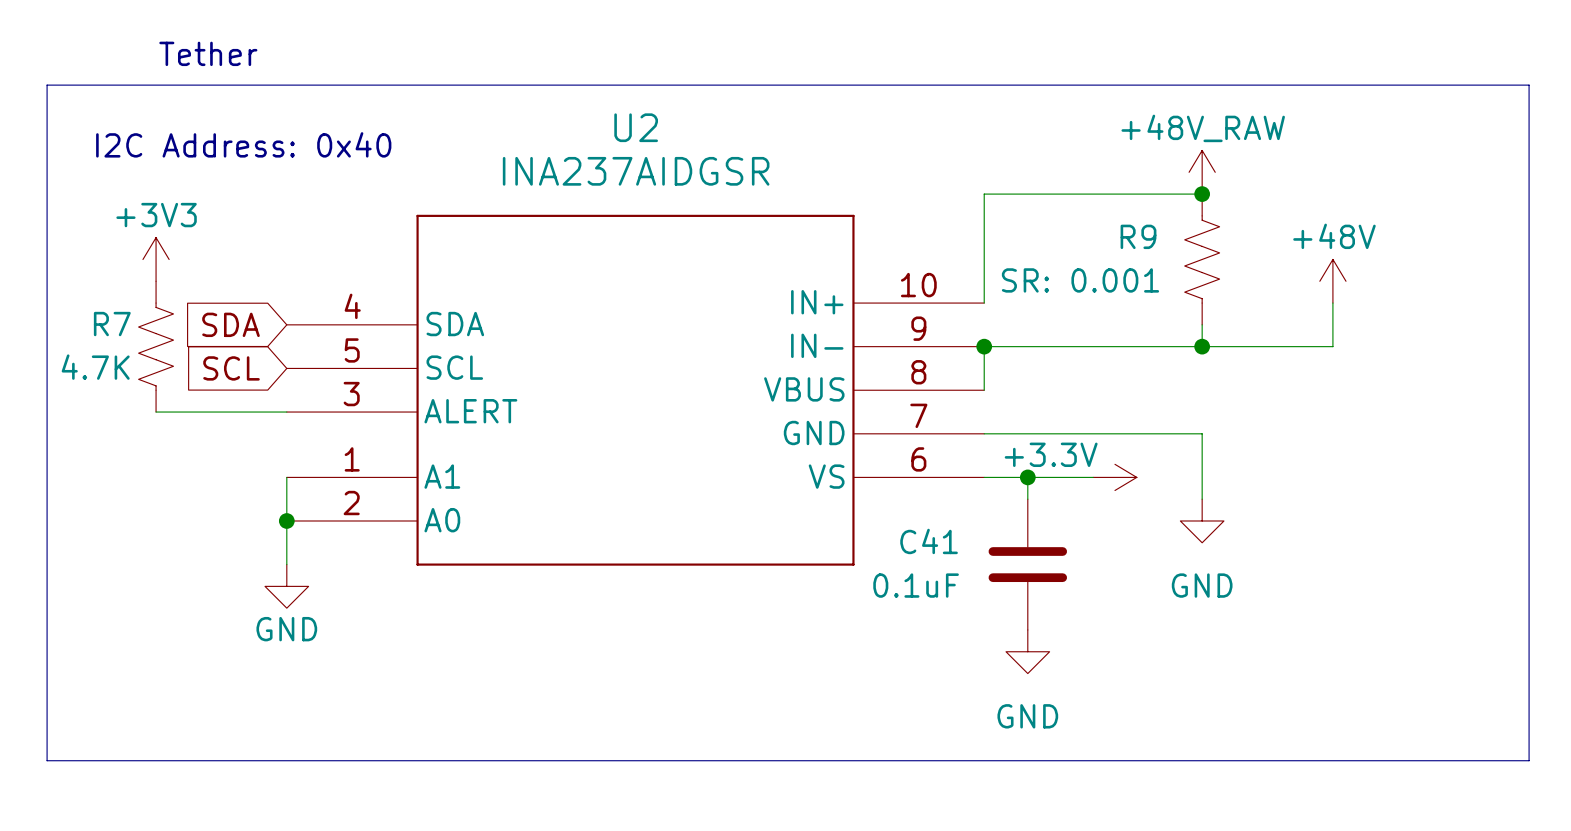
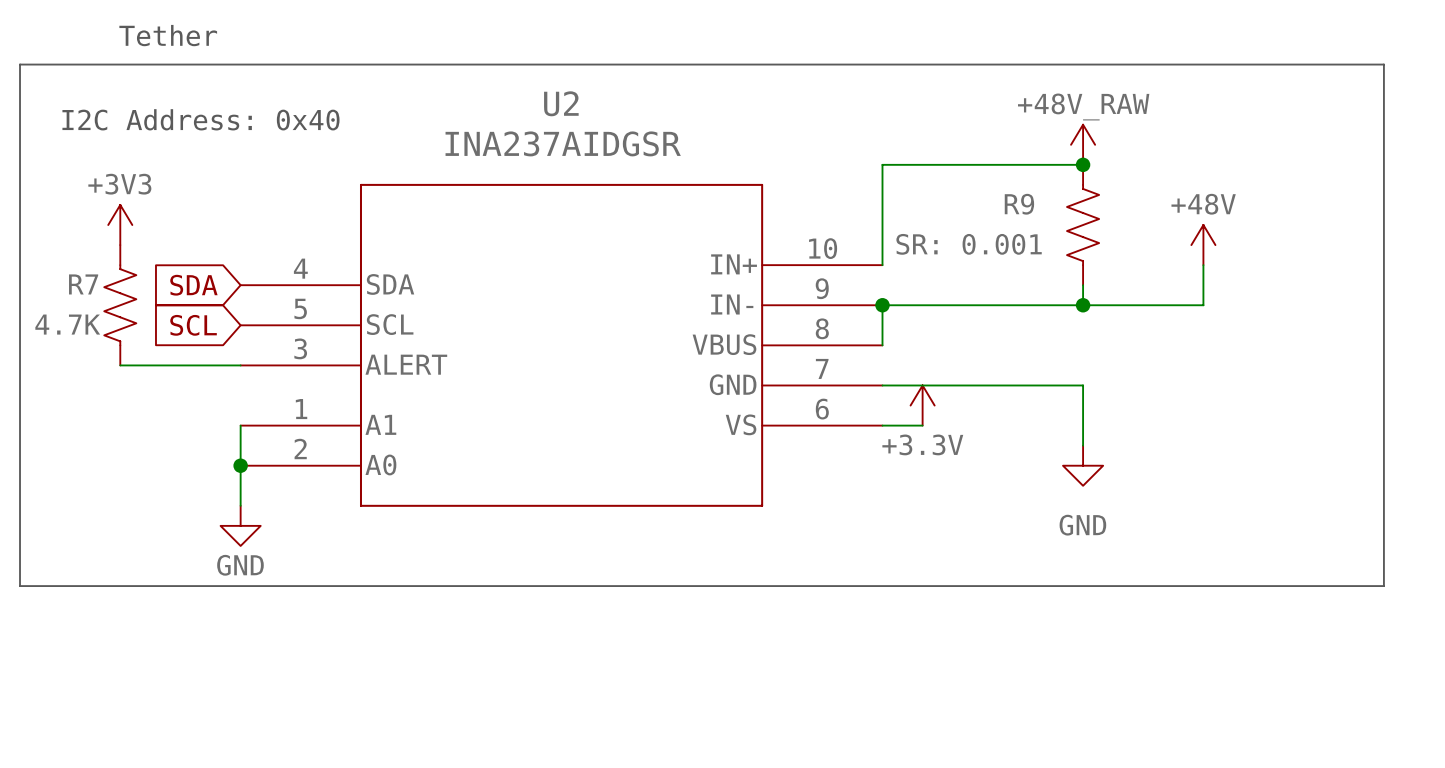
junction: (1027, 477) -> none
wire: (1093, 477) (1027, 477) (1027, 499) -> none
power symbol rotation: 0° (1114, 477) -> 90° counterclockwise (922, 405)
power symbol position: +3.3V (1114, 477) -> +3.3V (922, 405)
C41: 0.1uF (1027, 564) -> none
line: (47, 651) (47, 760) (1529, 760) (1529, 651) -> (20, 586) (1383, 586)
power symbol: GND (1027, 651) -> none

